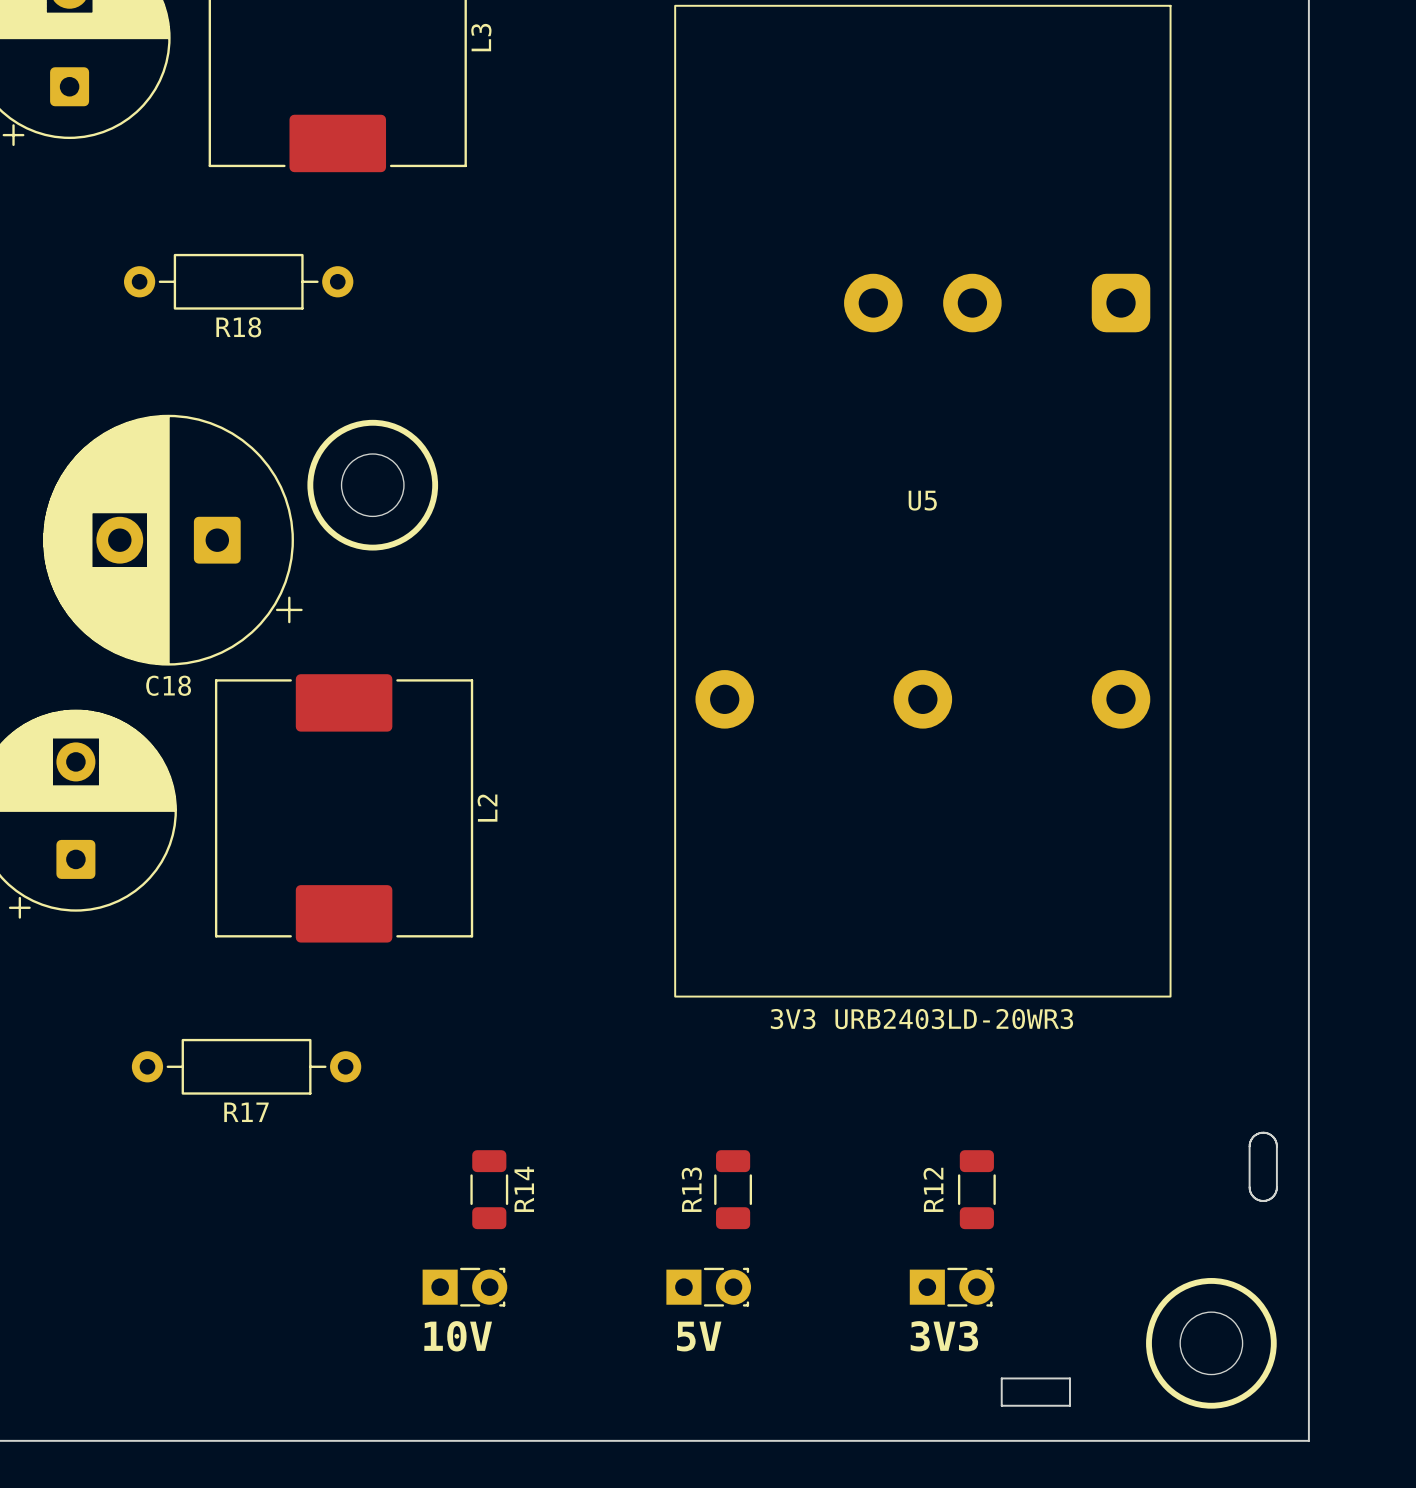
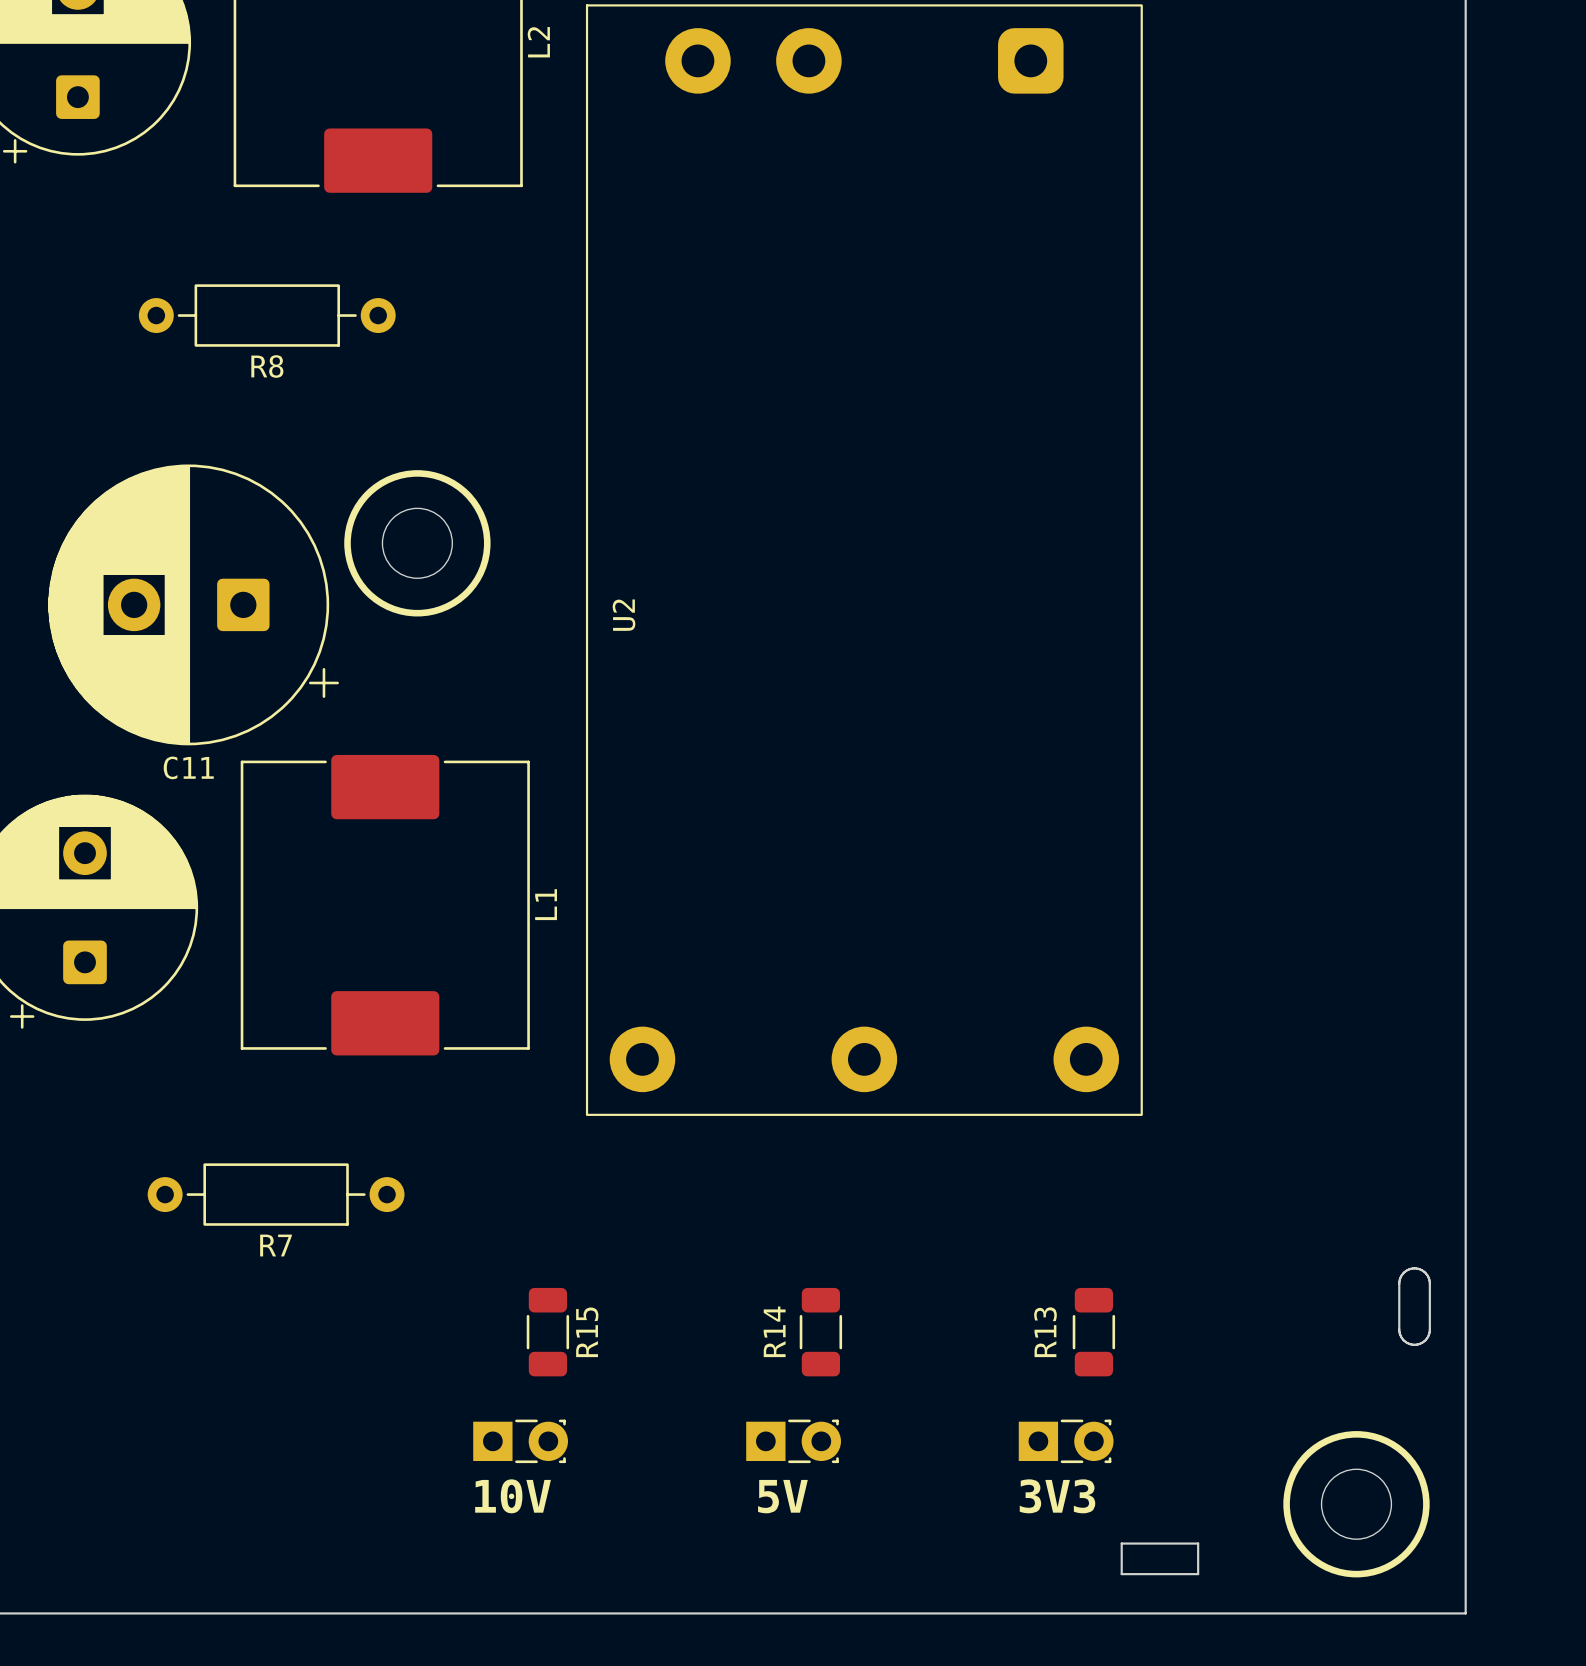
L3 name: L3 (481, 37) -> L2 (538, 42)
R18 name: R18 (238, 327) -> R8 (267, 366)
U2: none -> (864, 560)
U5: 3V3 URB2403LD-20WR3 (922, 501) -> none
C18 name: C18 (168, 685) -> C11 (188, 767)
L2 name: L2 (487, 808) -> L1 (546, 904)
R17 name: R17 (246, 1112) -> R7 (276, 1245)
R14 name: R14 (524, 1189) -> R15 (587, 1332)
R13 name: R13 (691, 1189) -> R14 (774, 1331)
R12 name: R12 (933, 1189) -> R13 (1045, 1332)

